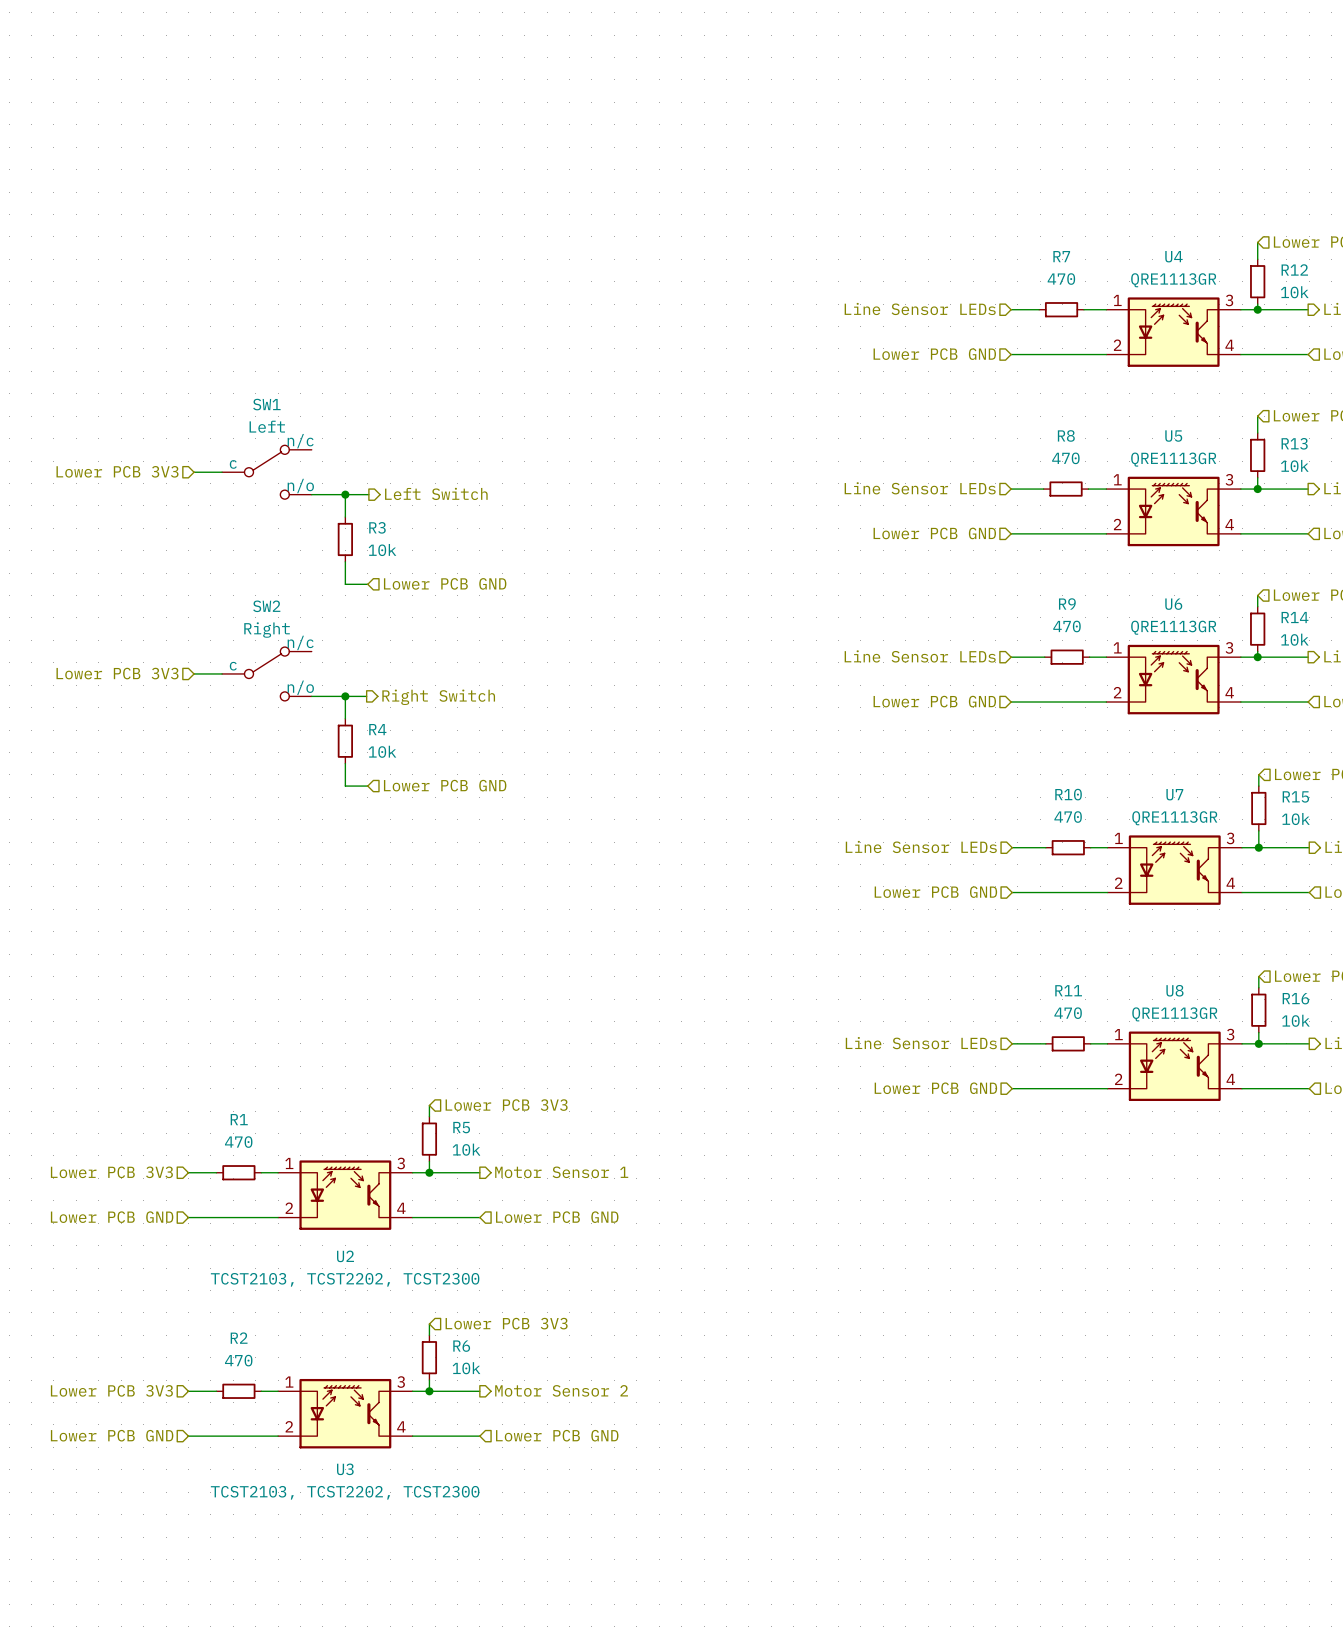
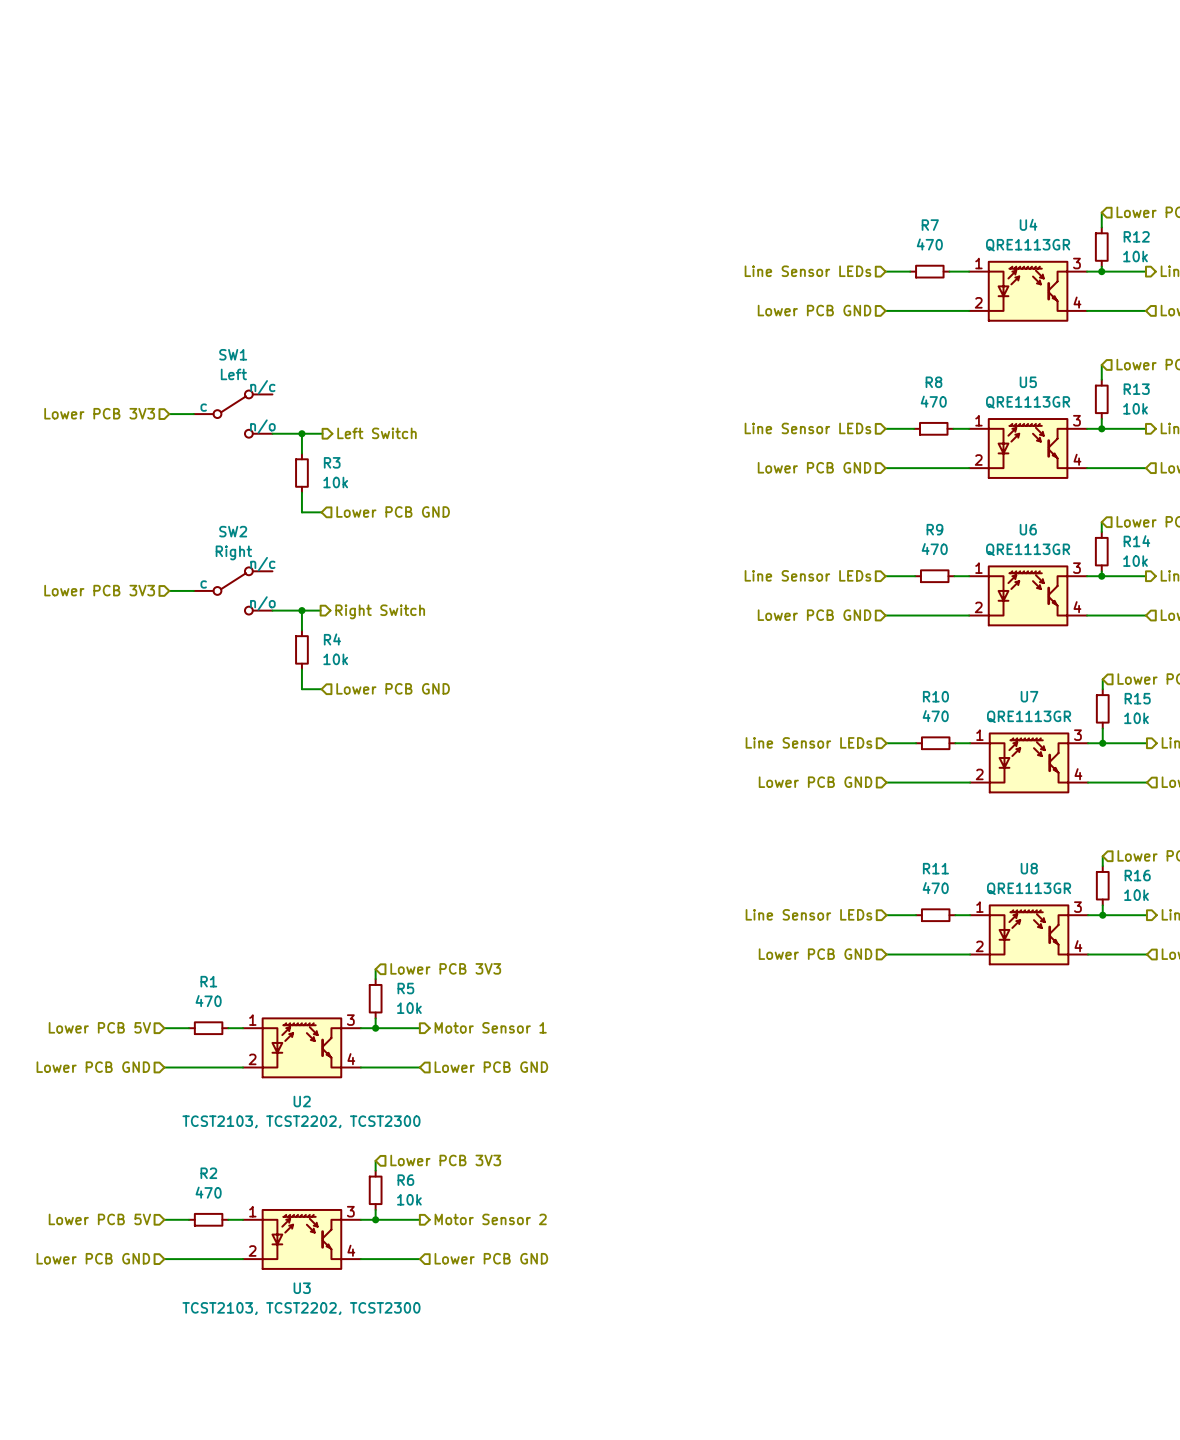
hierarchical label: Lower PCB 3V3 (111, 1172) -> Lower PCB 5V (99, 1027)
hierarchical label: Lower PCB 3V3 (111, 1390) -> Lower PCB 5V (99, 1219)

